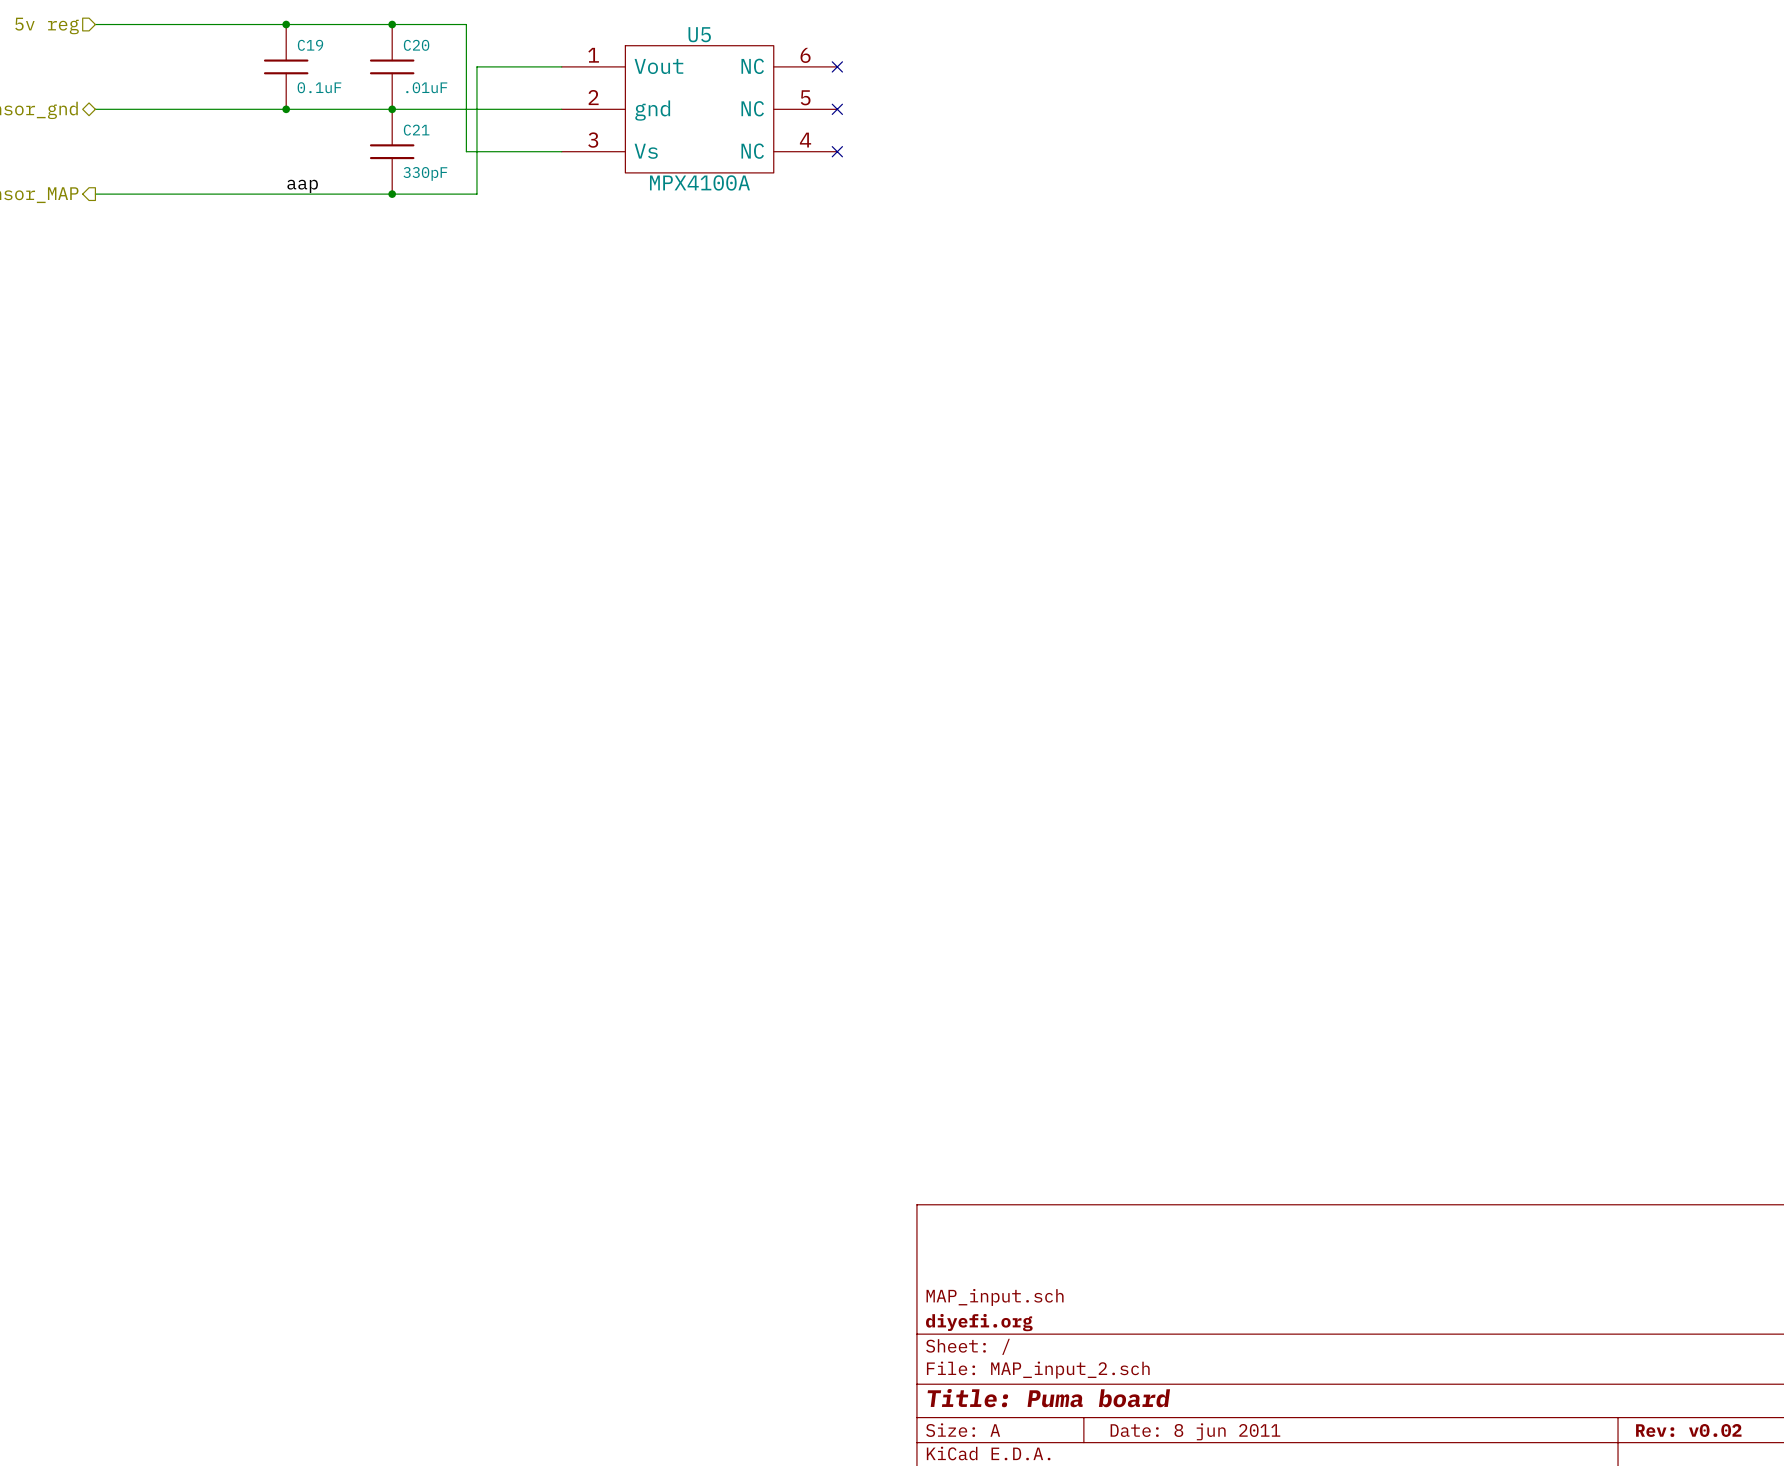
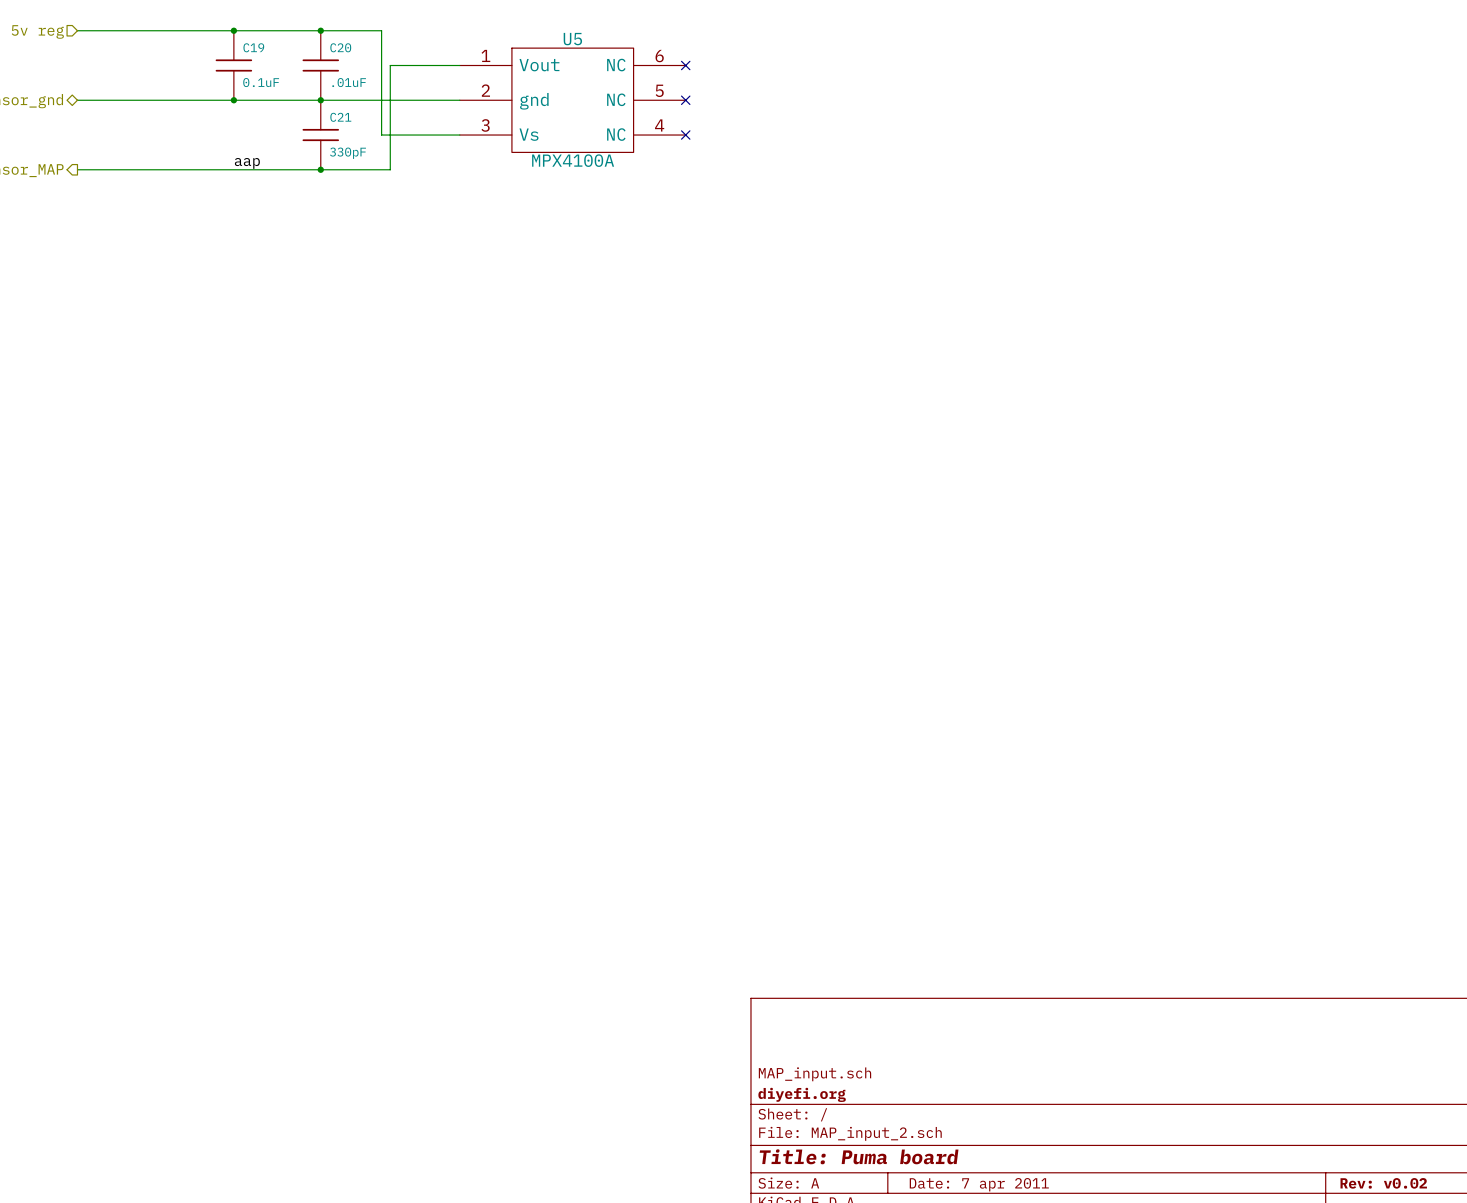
title block: Date: 8 jun 2011 (1195, 1431) -> Date: 7 apr 2011 (979, 1184)

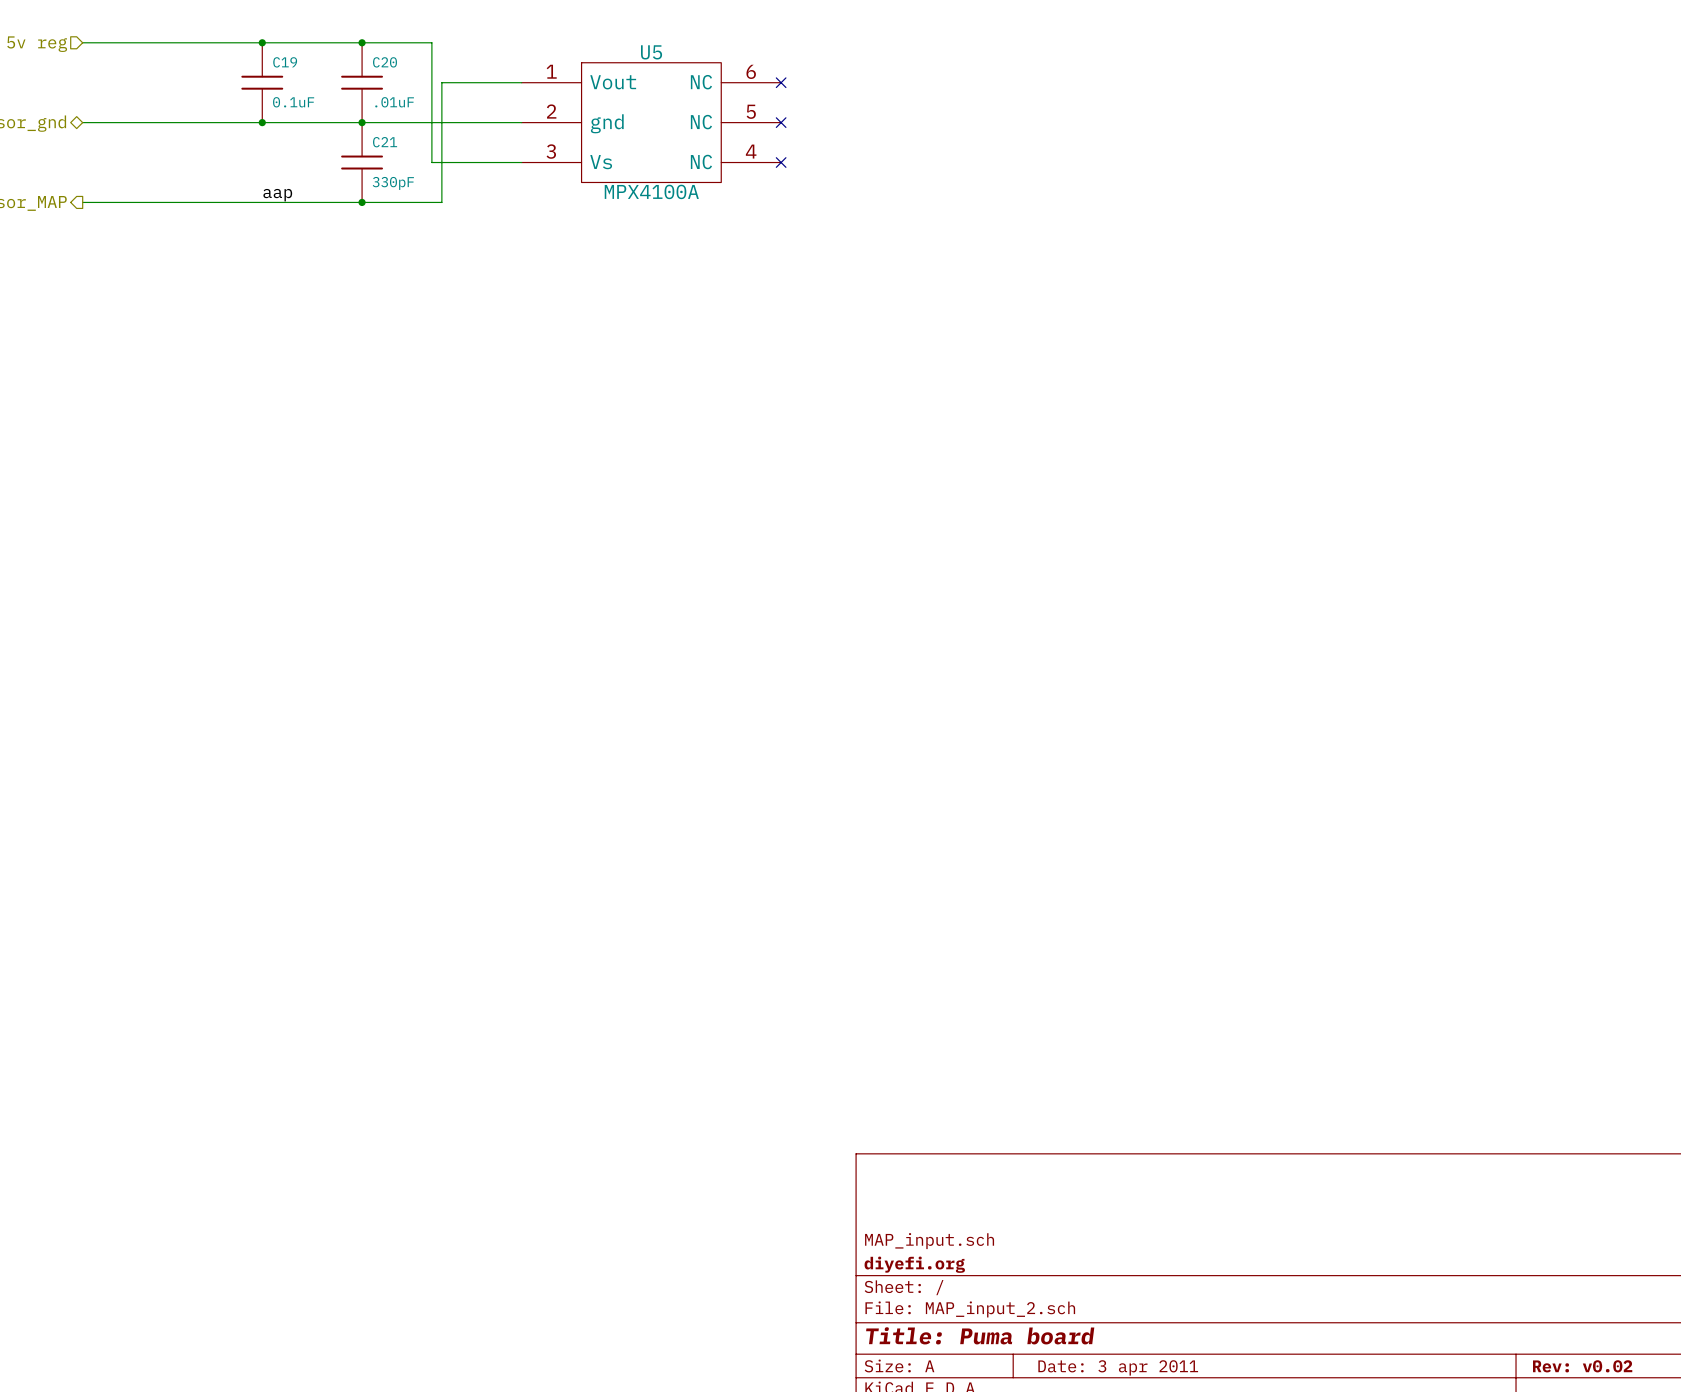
title block: Date: 7 apr 2011 (979, 1184) -> Date: 3 apr 2011 (1118, 1367)

